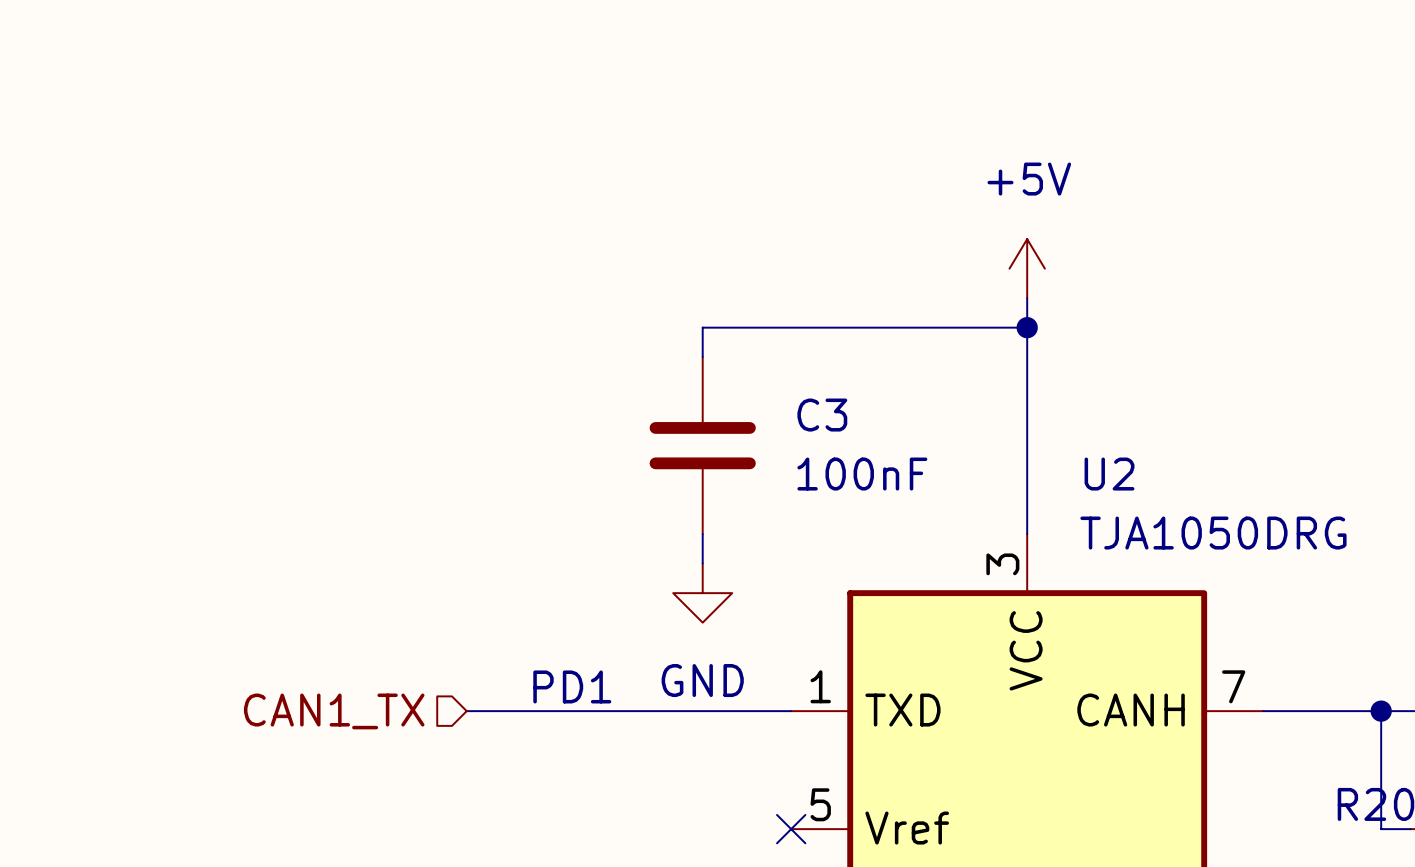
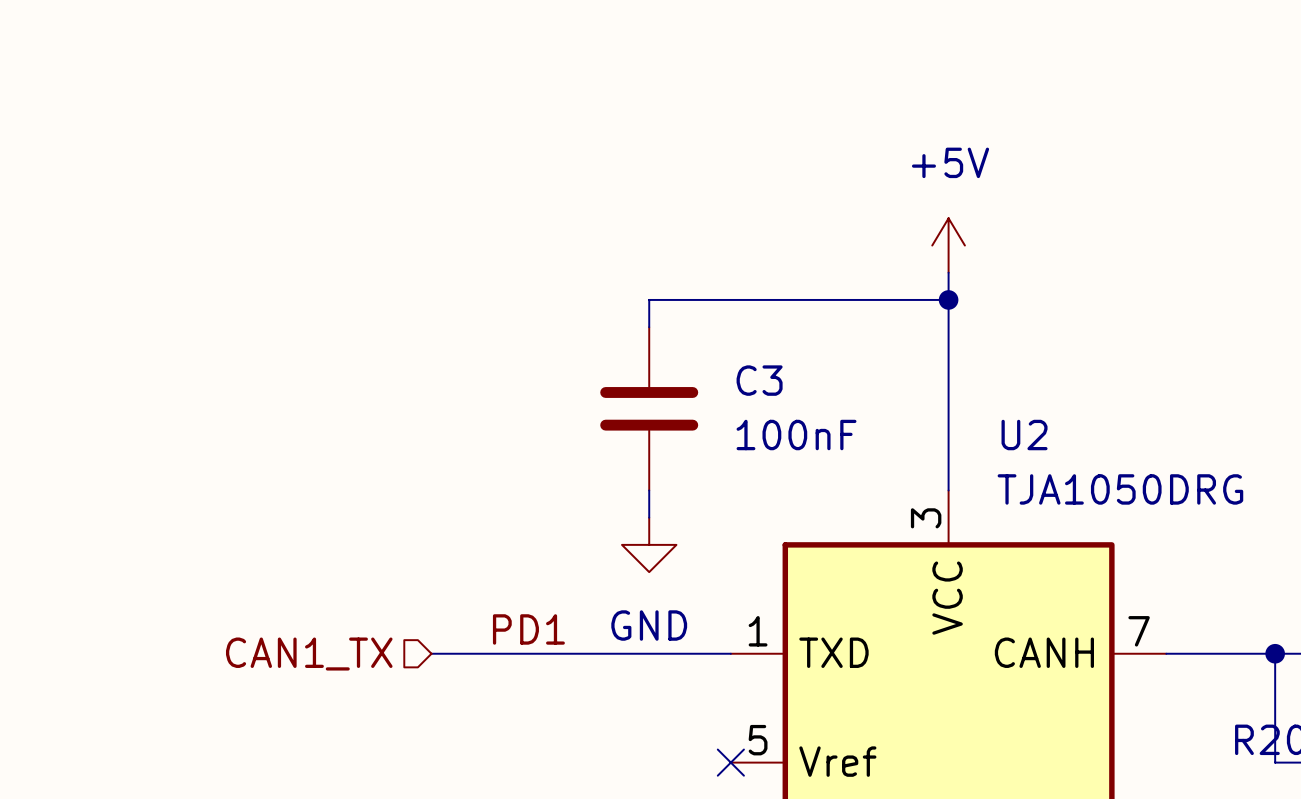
label: none -> PD1 (528, 629)
text: PD1 (572, 686) -> none

